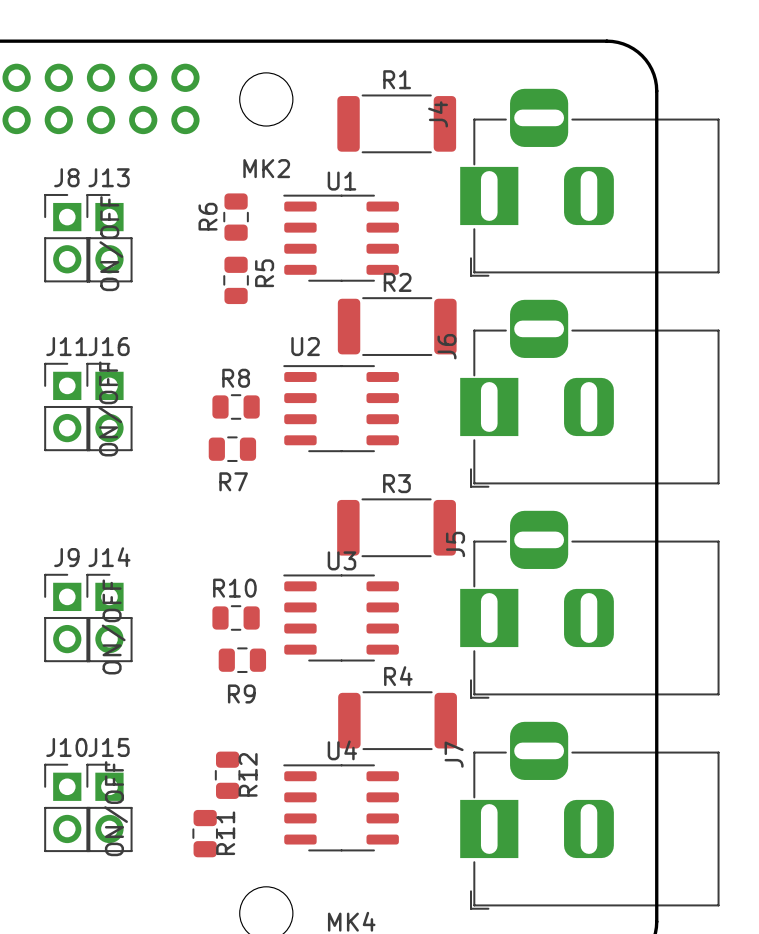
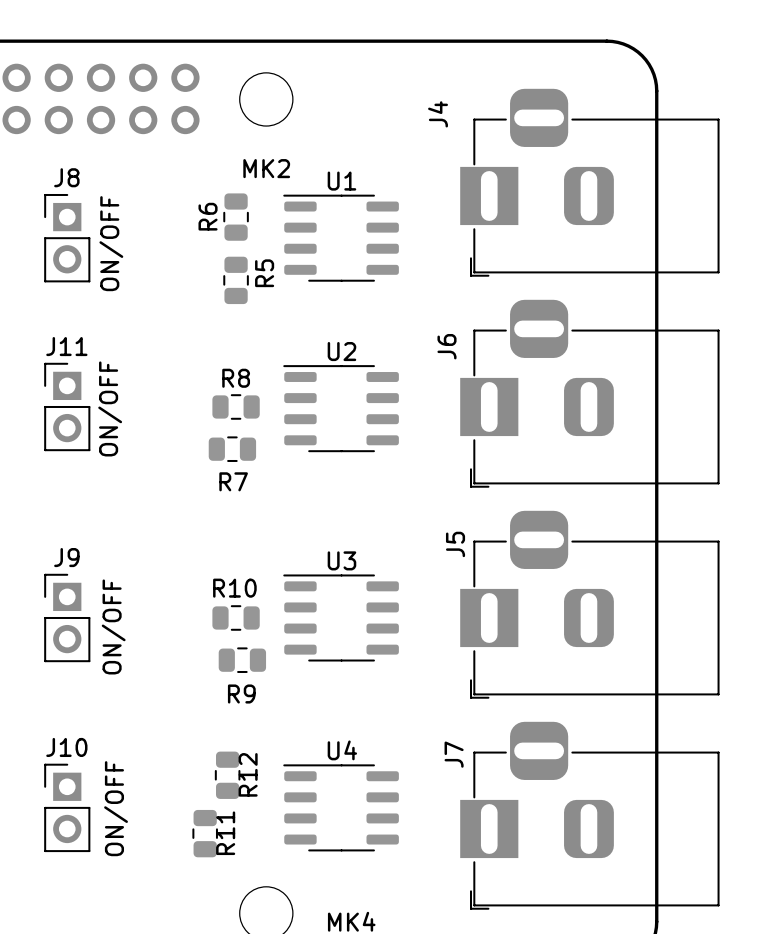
R1: (396, 123) -> none
J13: (109, 238) -> none
R2: (397, 326) -> none
U2 name position: U2 (305, 346) -> U2 (341, 351)
J16: (109, 406) -> none
R3: (396, 527) -> none
J14: (109, 617) -> none
R4: (397, 720) -> none
J15: (109, 807) -> none

